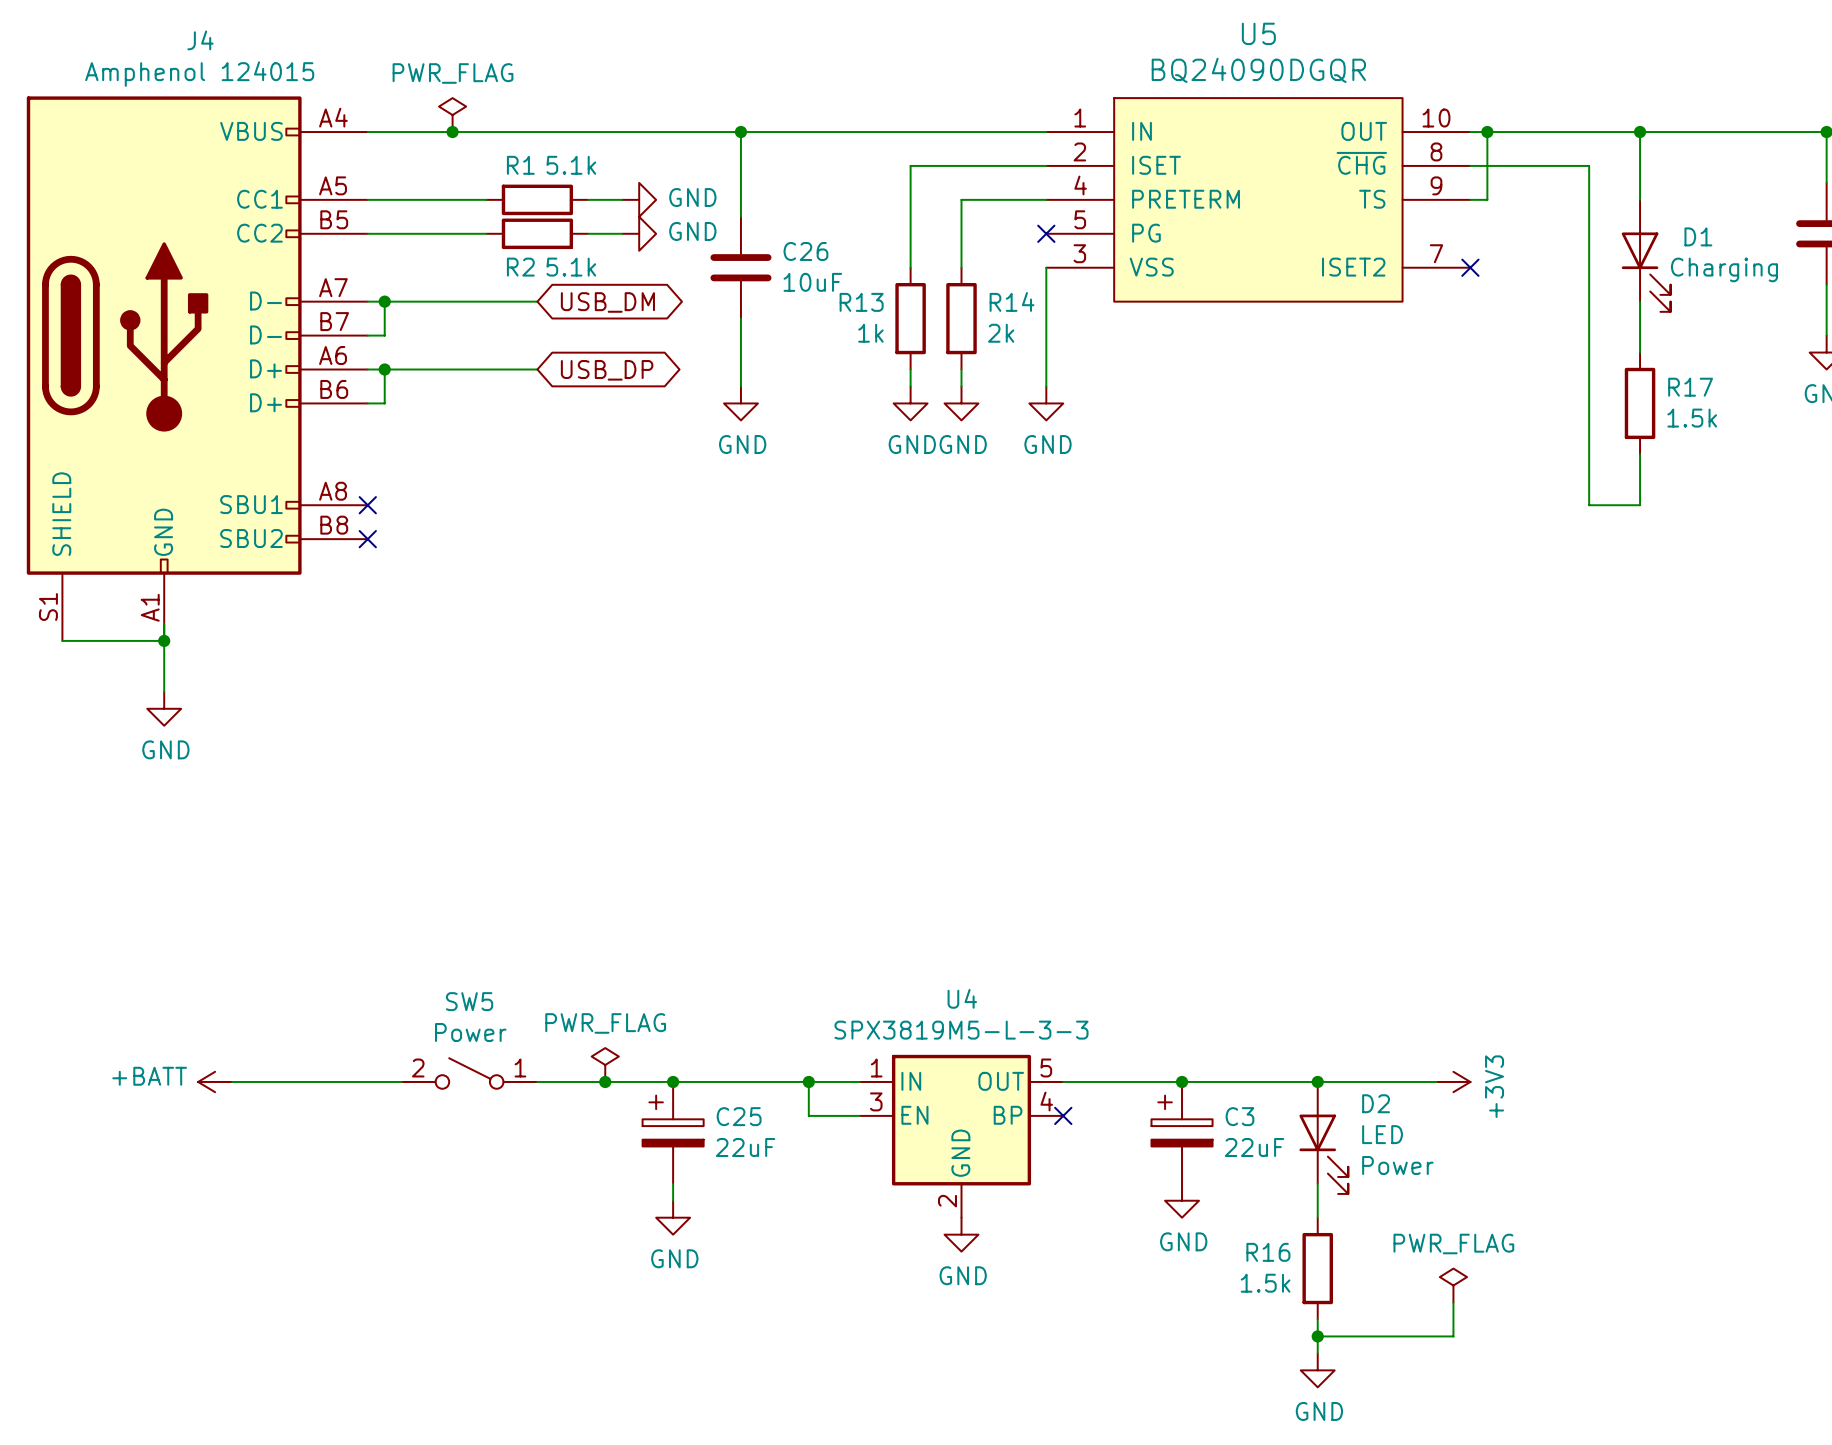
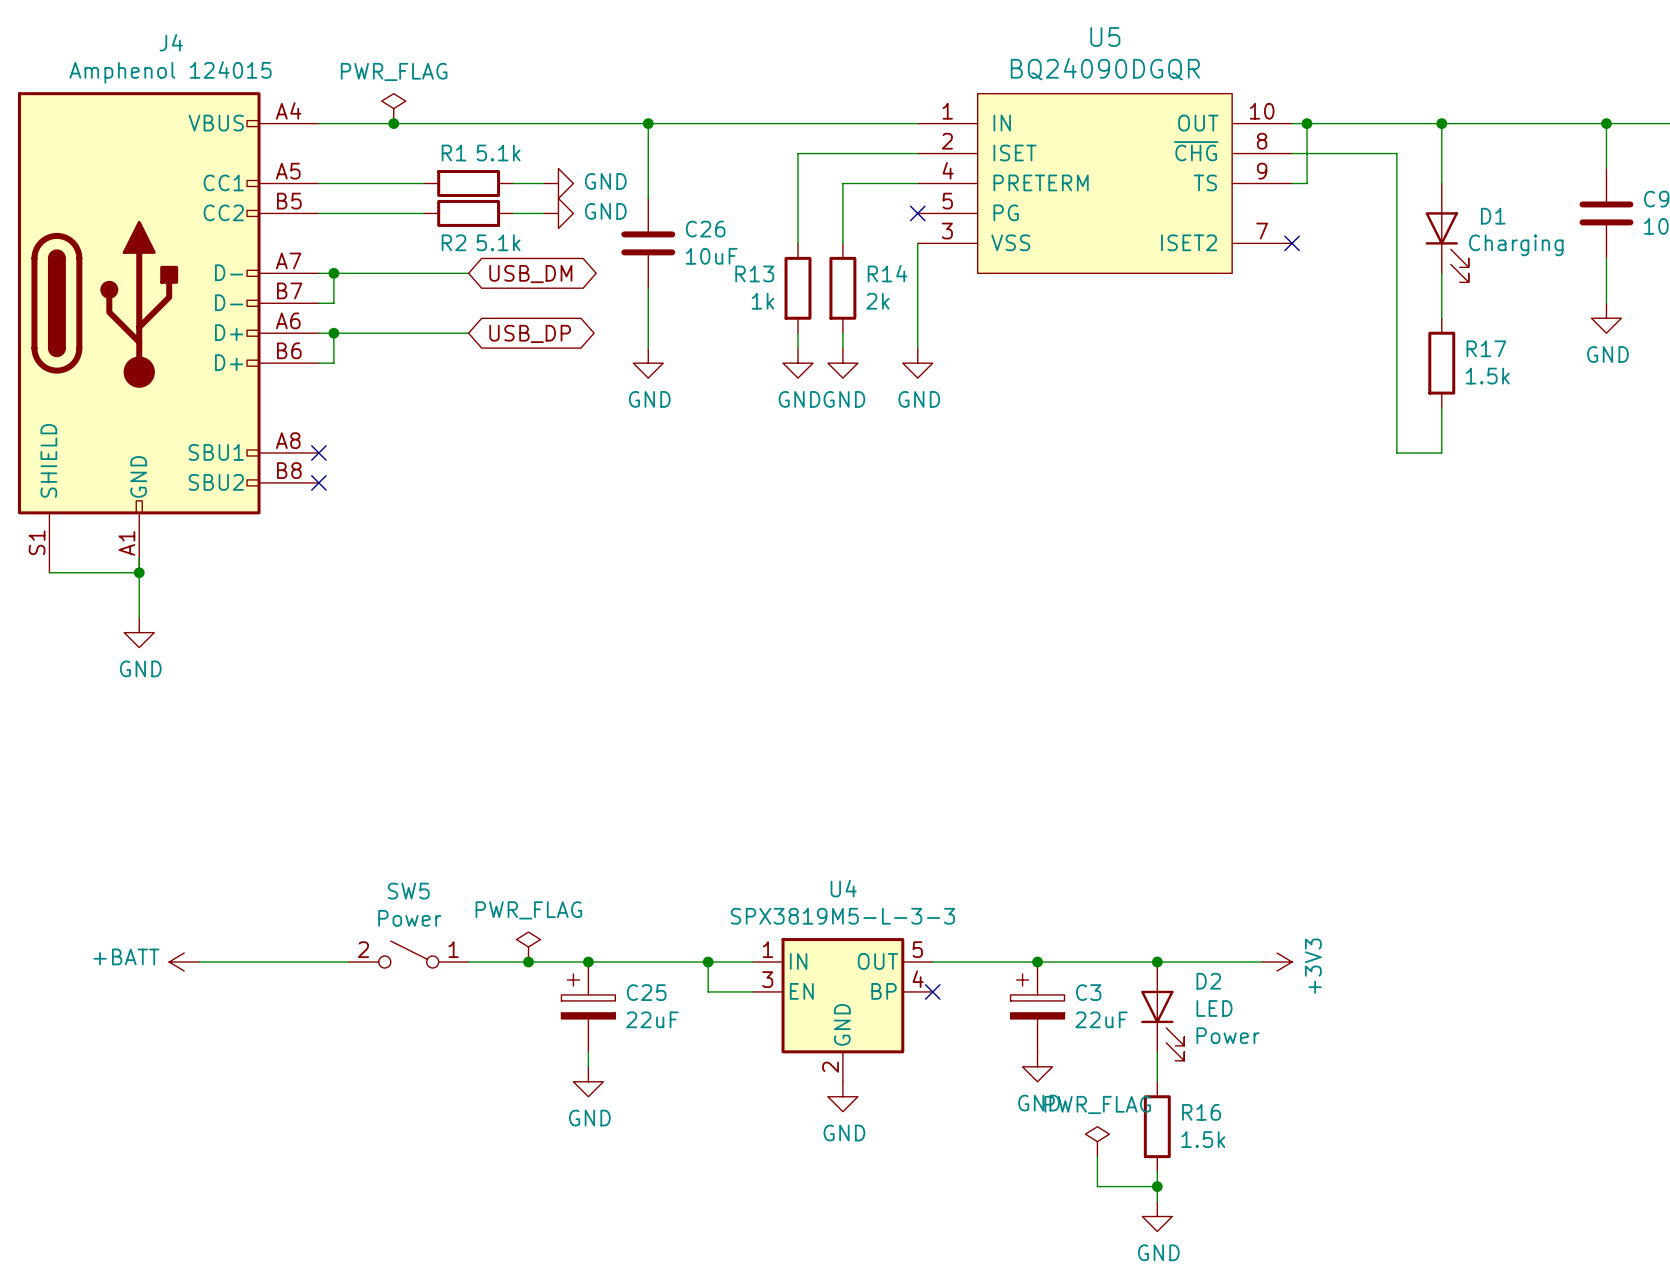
R16 name position: R16 (1268, 1252) -> R16 (1201, 1112)
R16 value position: 1.5k (1265, 1283) -> 1.5k (1203, 1139)
power symbol position: PWR_FLAG (1453, 1285) -> PWR_FLAG (1097, 1141)
wire: (1453, 1302) (1453, 1336) (1317, 1336) -> (1097, 1156) (1097, 1186) (1157, 1186)

